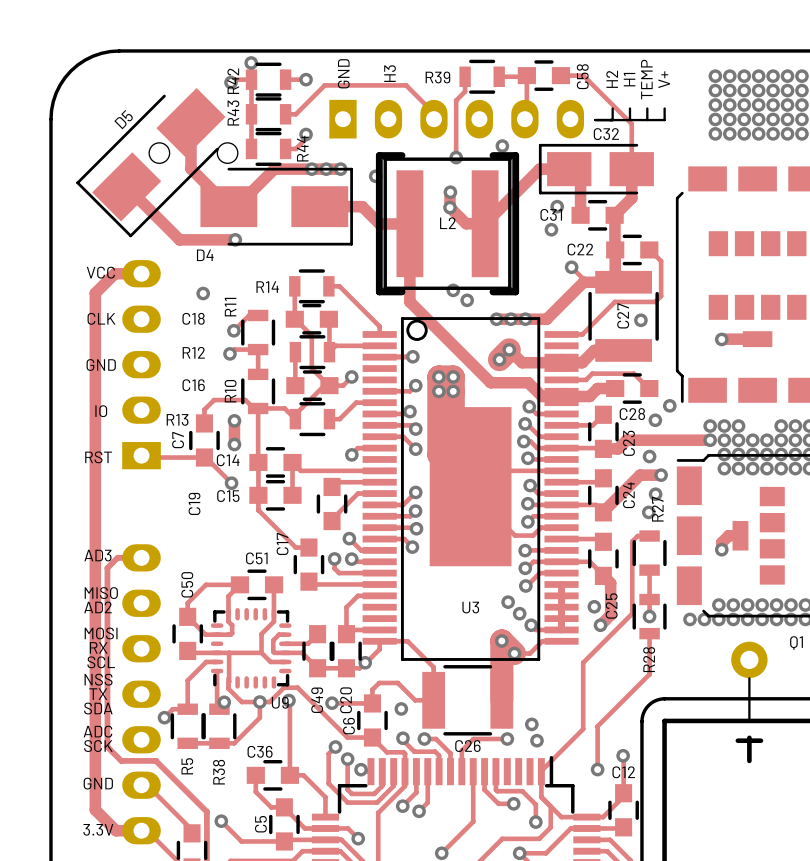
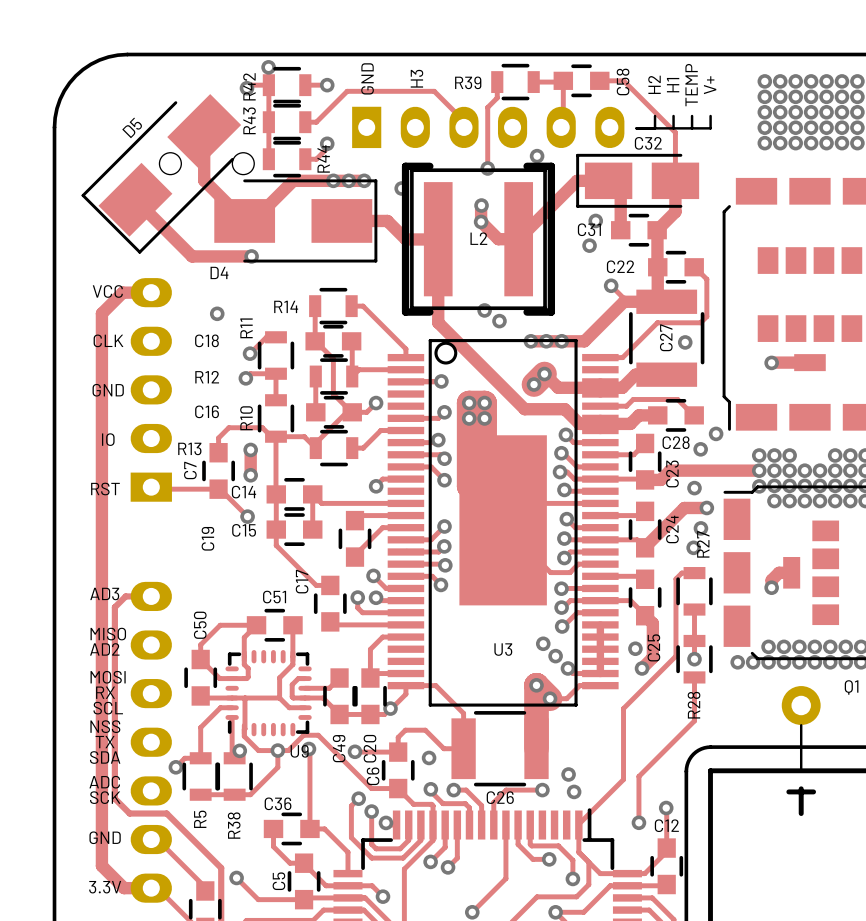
via: none -> (759, 486)

